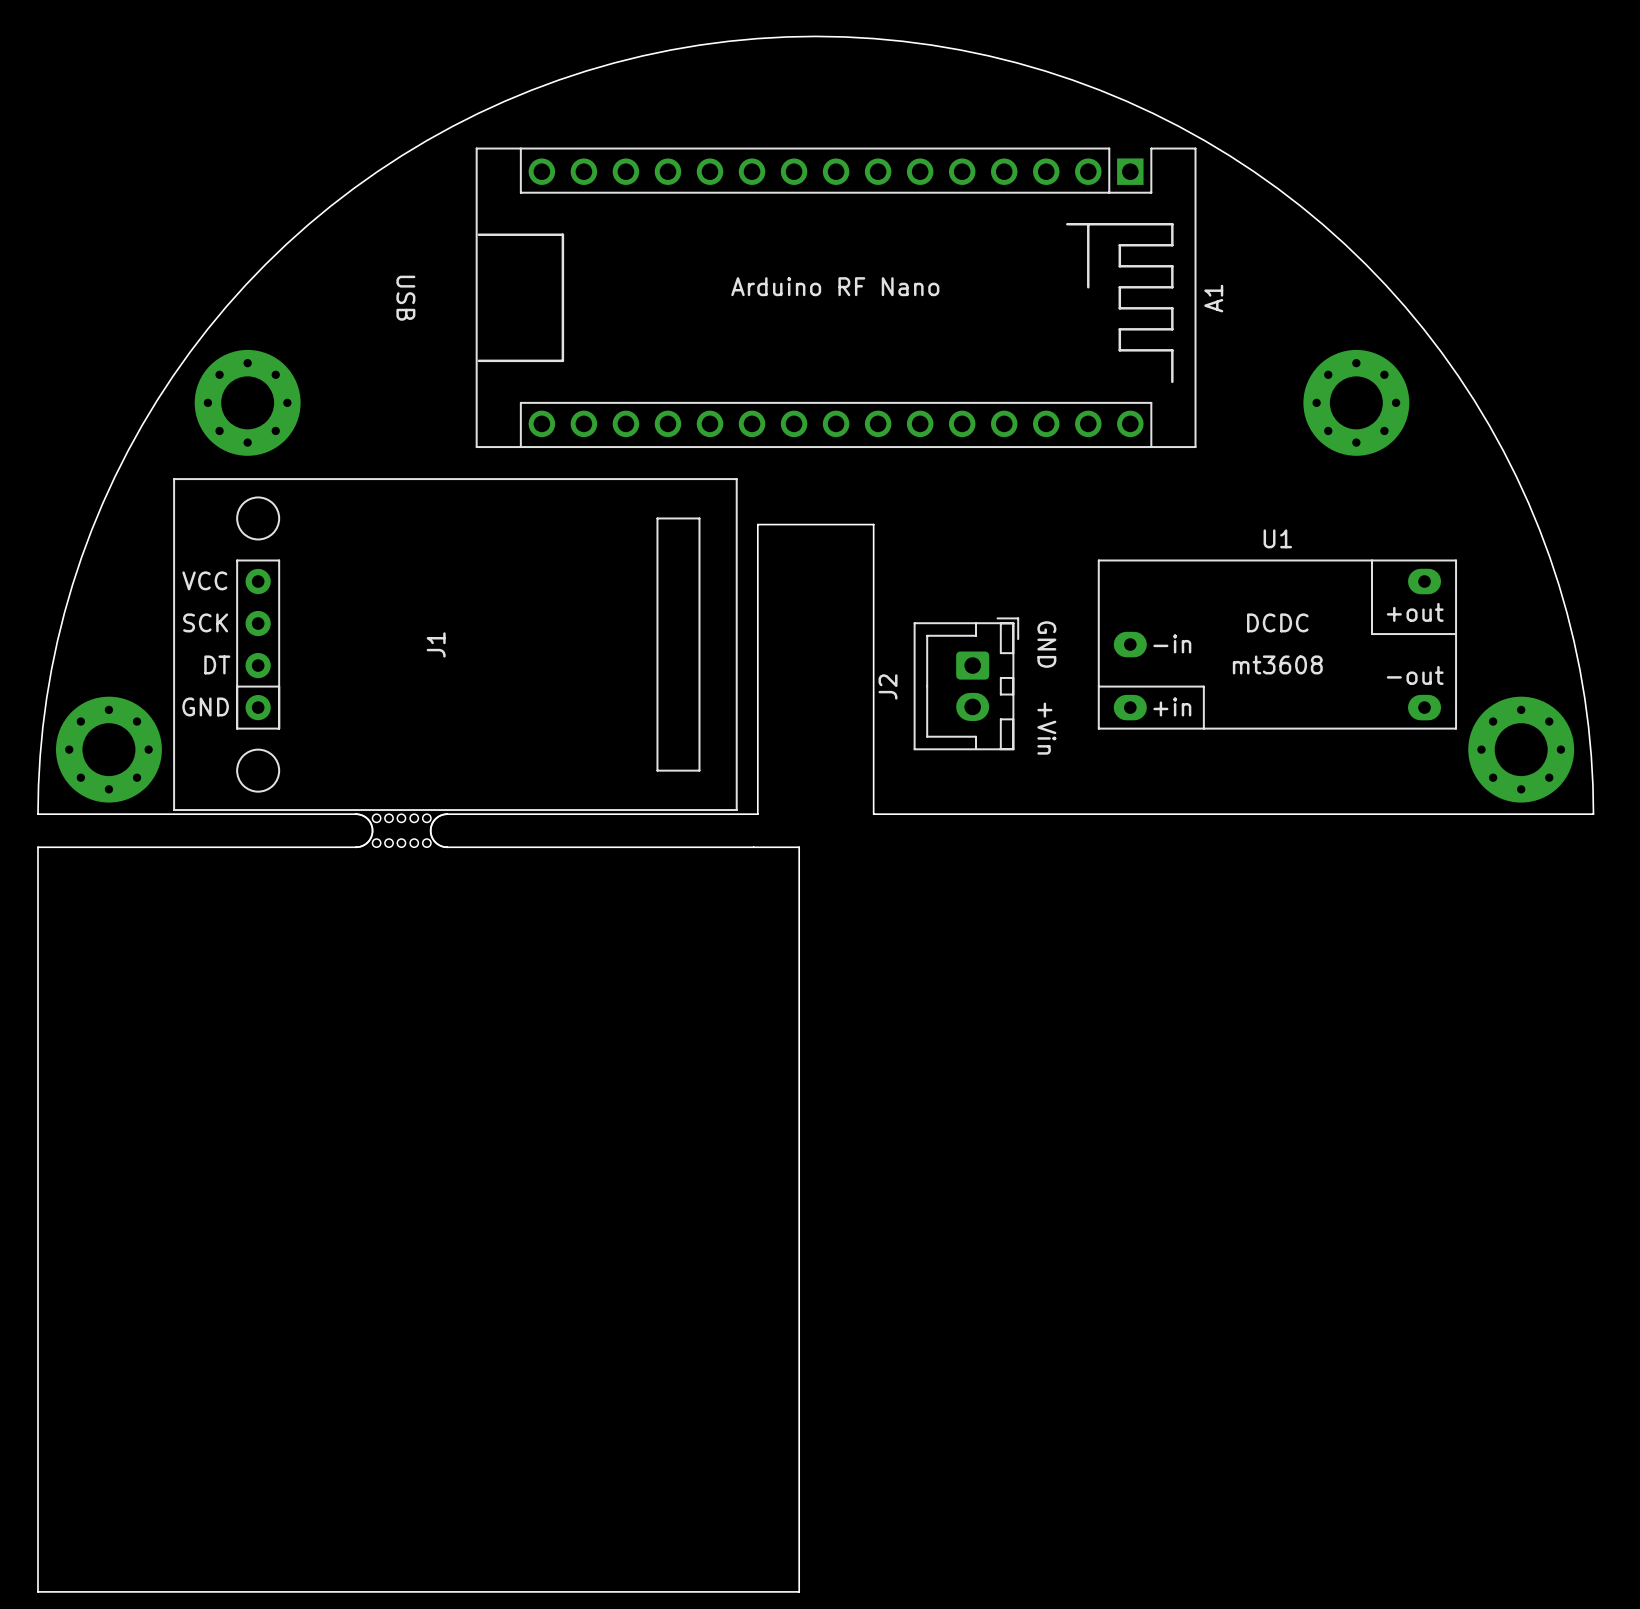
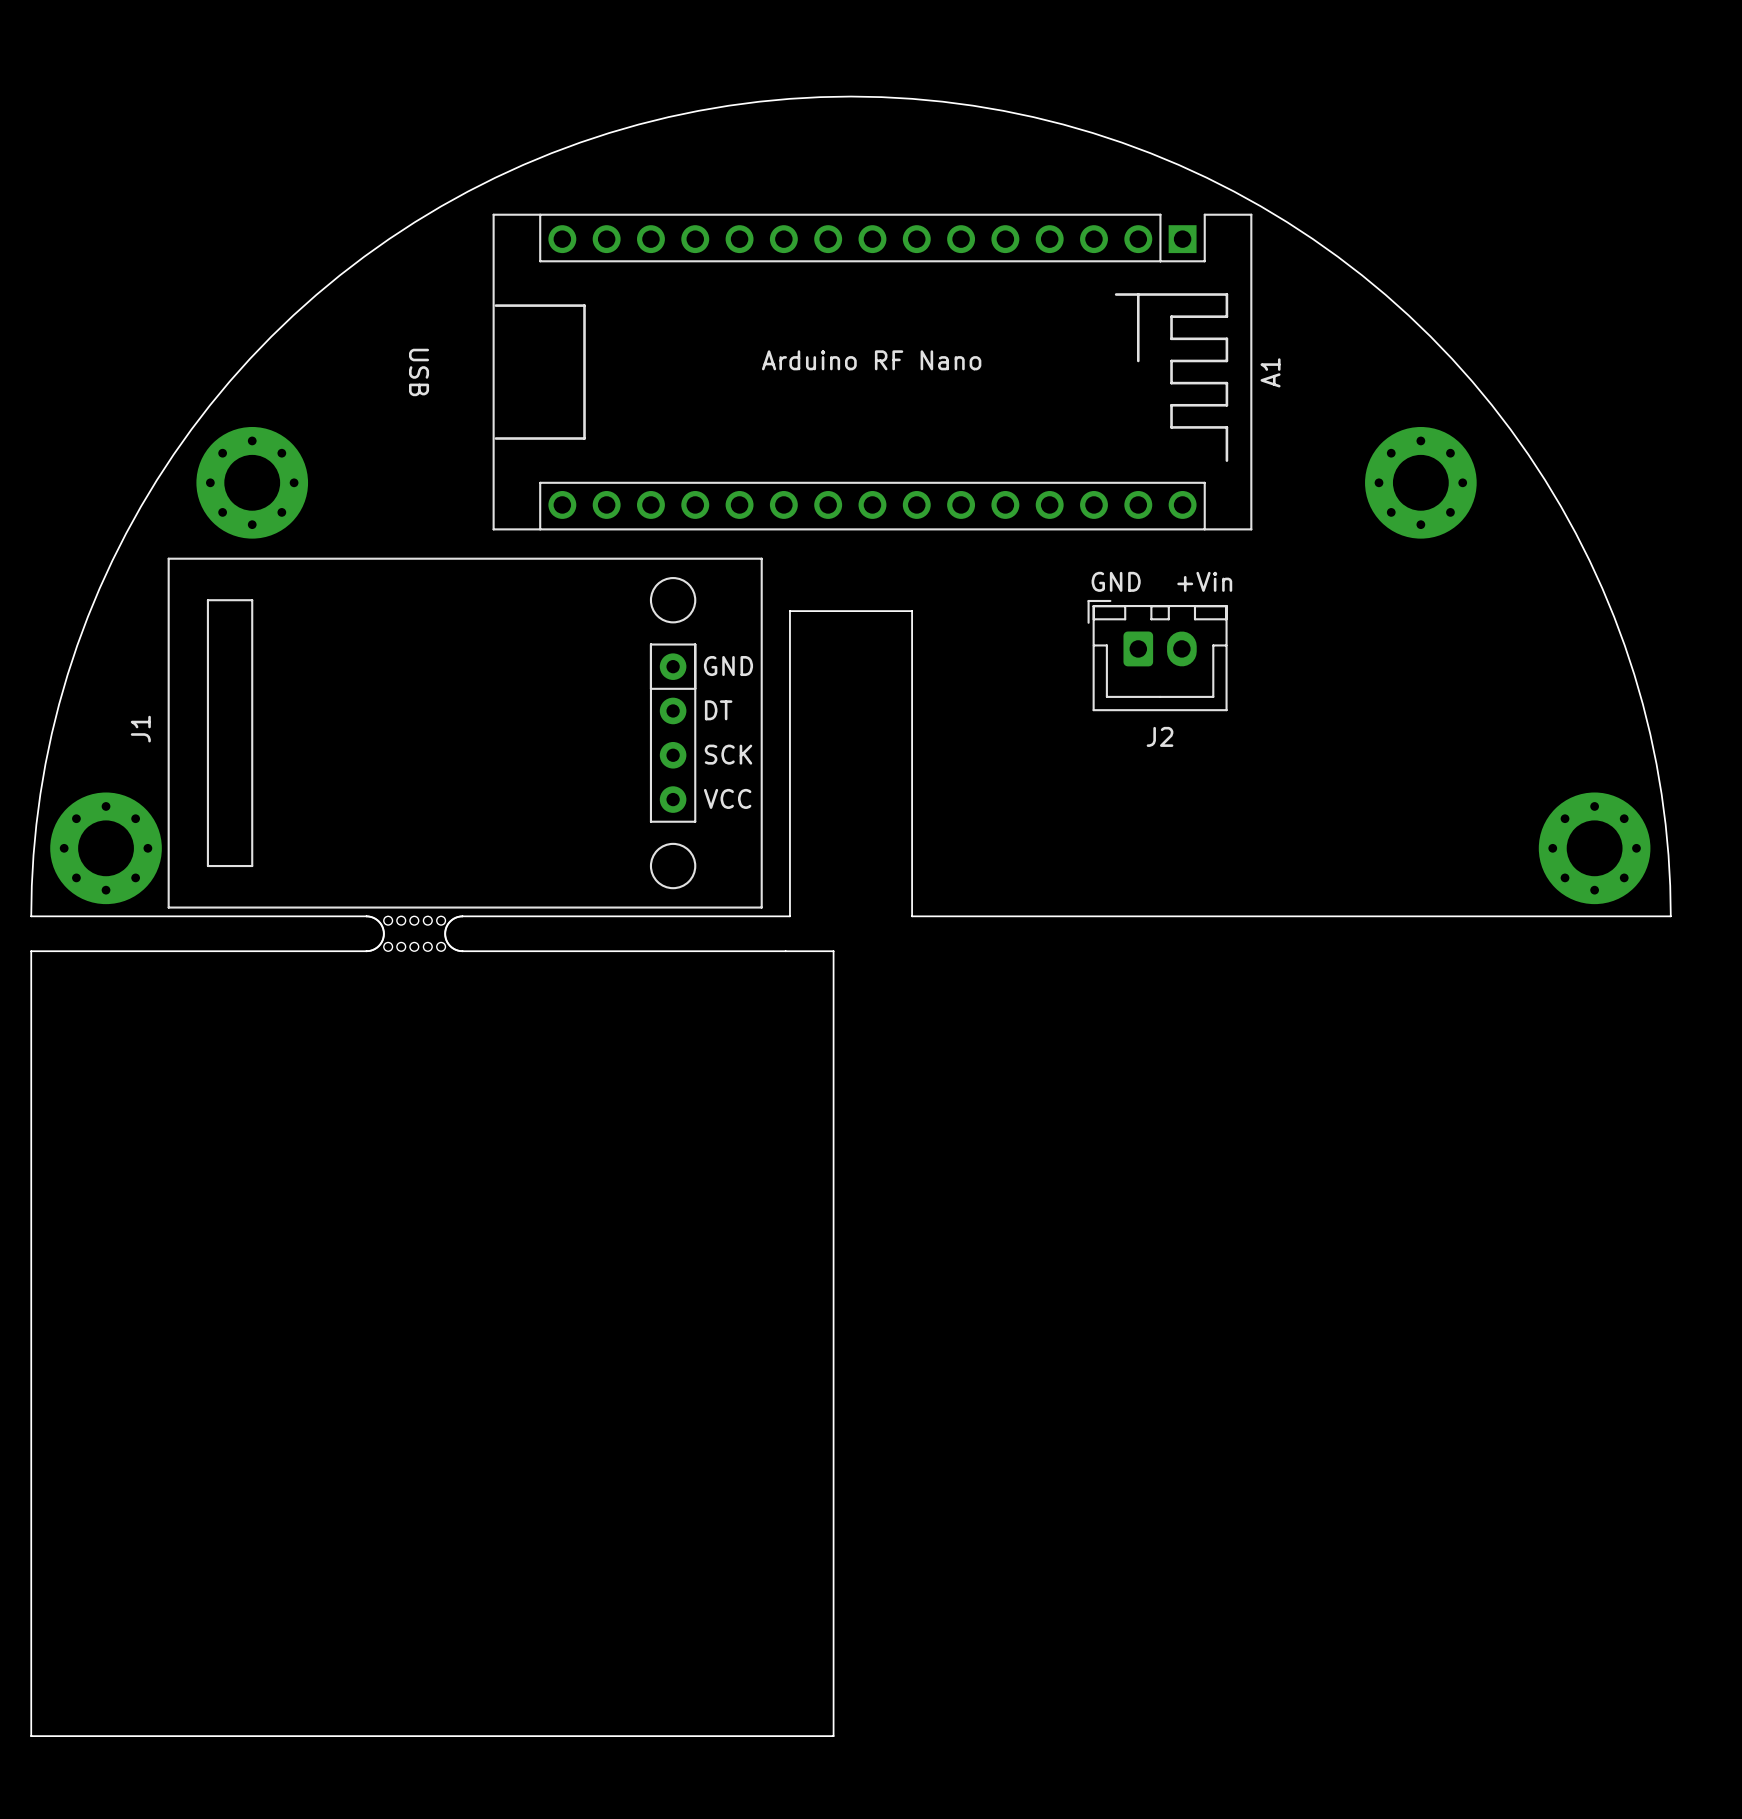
J1 name position: J1 (436, 644) -> J1 (140, 729)
J1 rotation: 0° (455, 644) -> 180° (465, 733)
text rotation: 0° (1046, 644) -> 90° counterclockwise (1116, 581)
text position: GND (1046, 644) -> GND (1116, 581)
U1: (1277, 644) -> none
J2 rotation: 0° (966, 683) -> 90° counterclockwise (1157, 655)
J2 position: (966, 683) -> (1157, 655)
text rotation: 0° (1046, 728) -> 90° counterclockwise (1204, 581)
text position: +Vin (1046, 728) -> +Vin (1204, 581)

